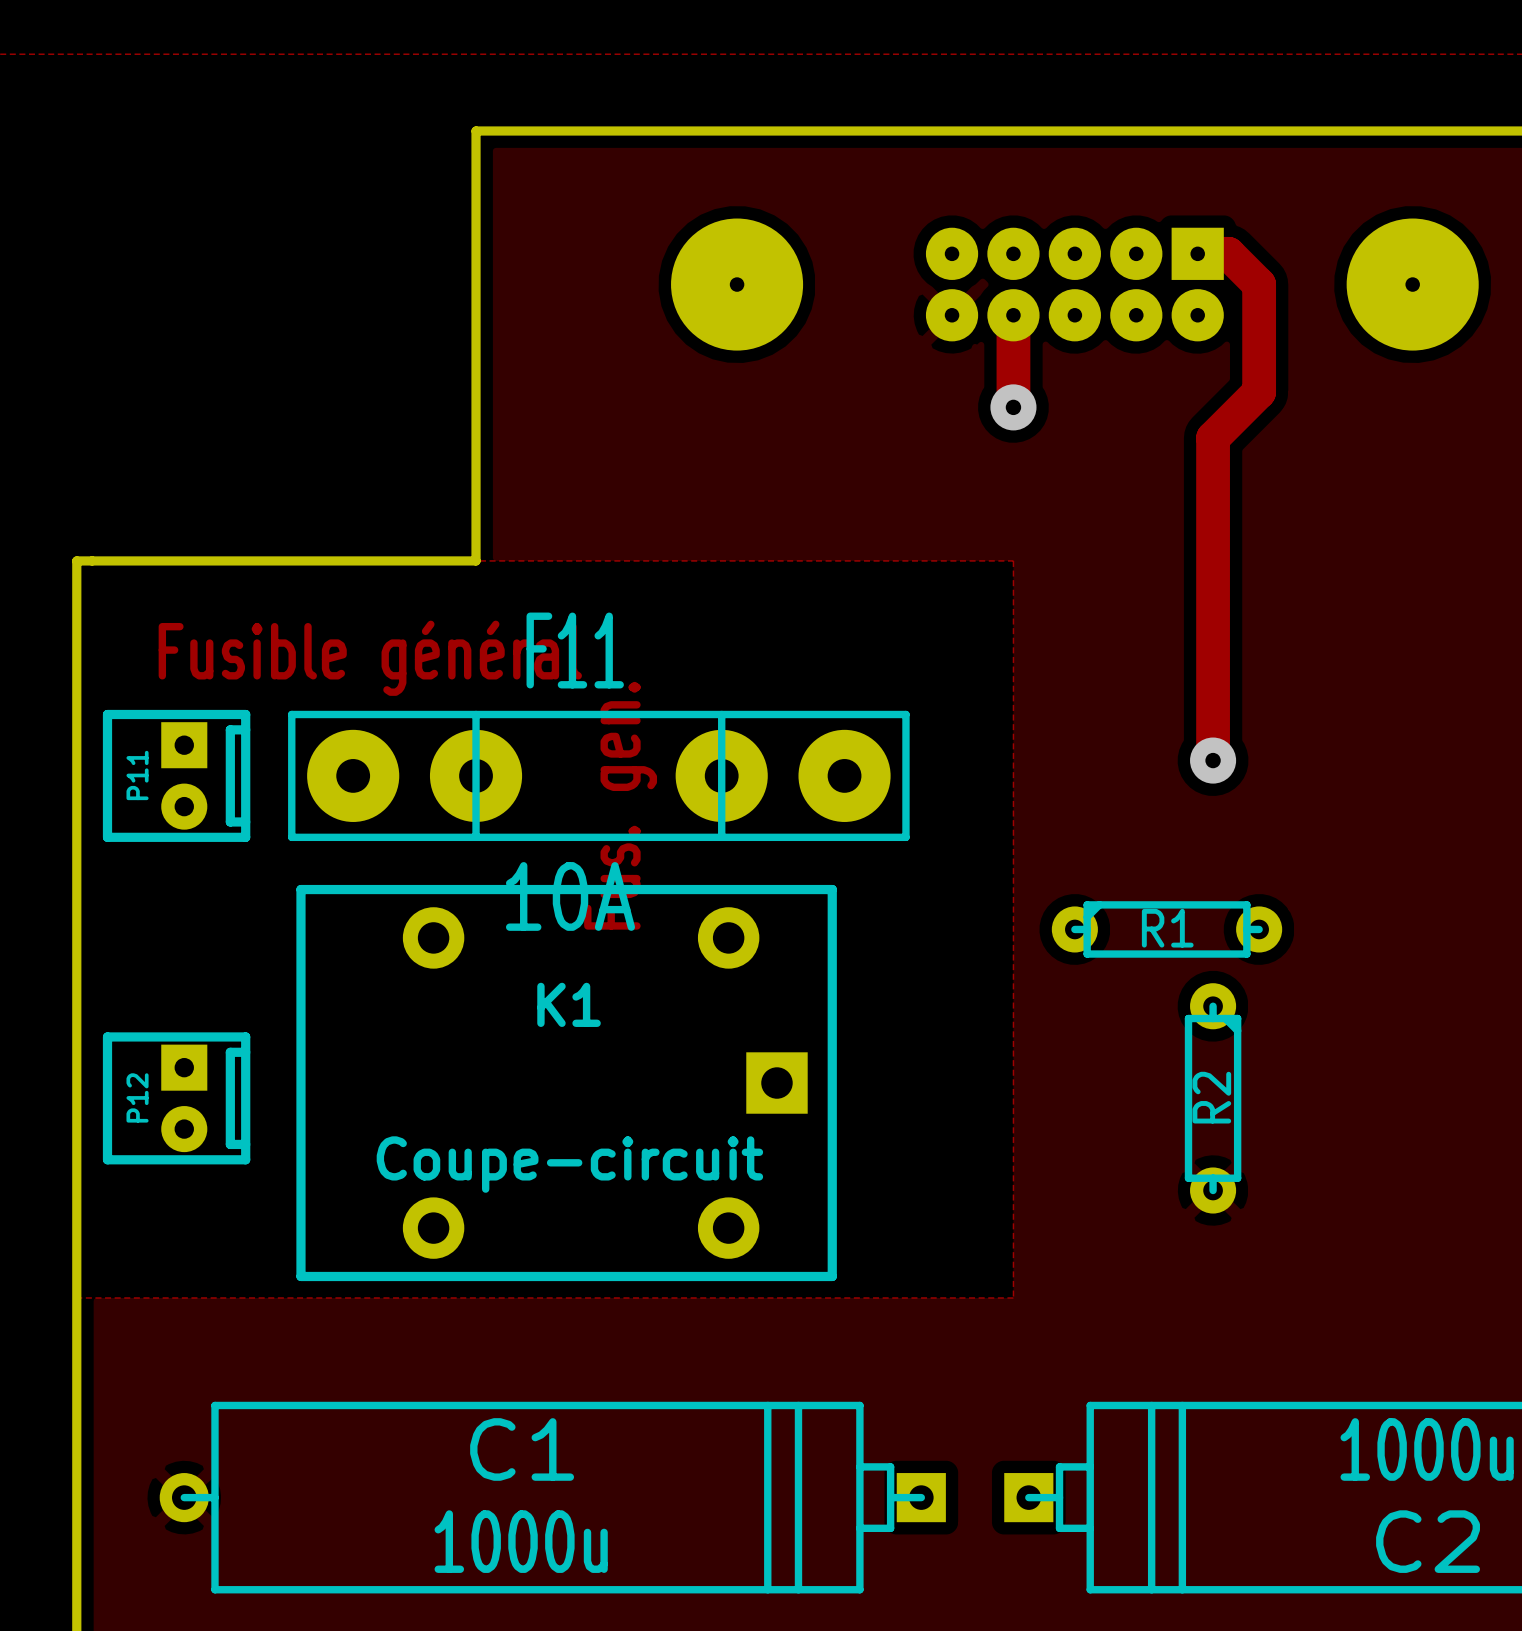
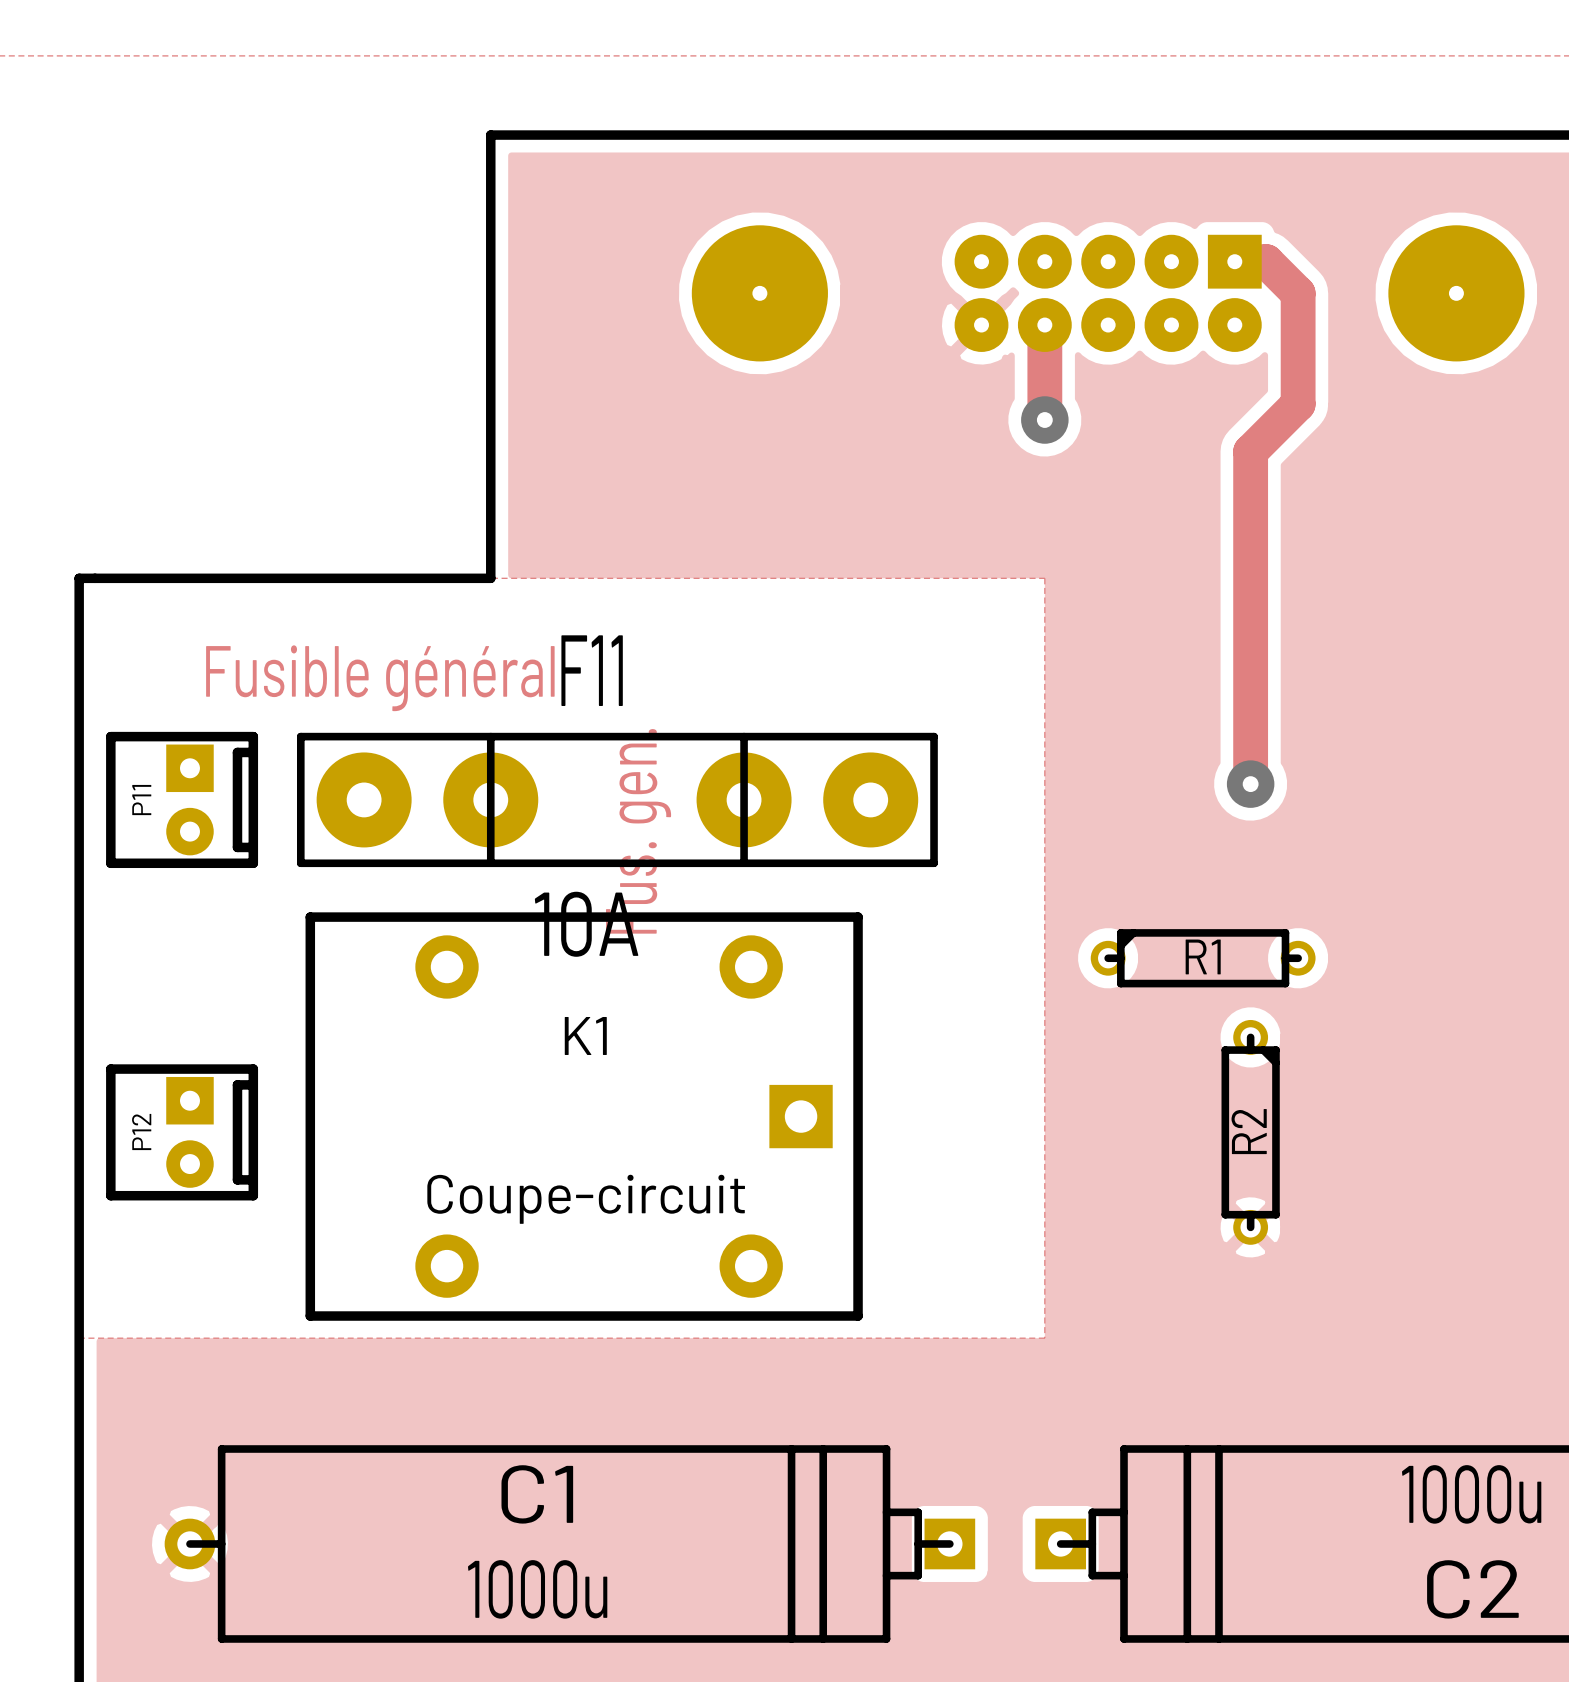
R1 footprint: [1051, 901, 1283, 958] -> [1090, 929, 1316, 988]
R2 footprint: [1184, 983, 1242, 1214] -> [1221, 1019, 1280, 1245]

